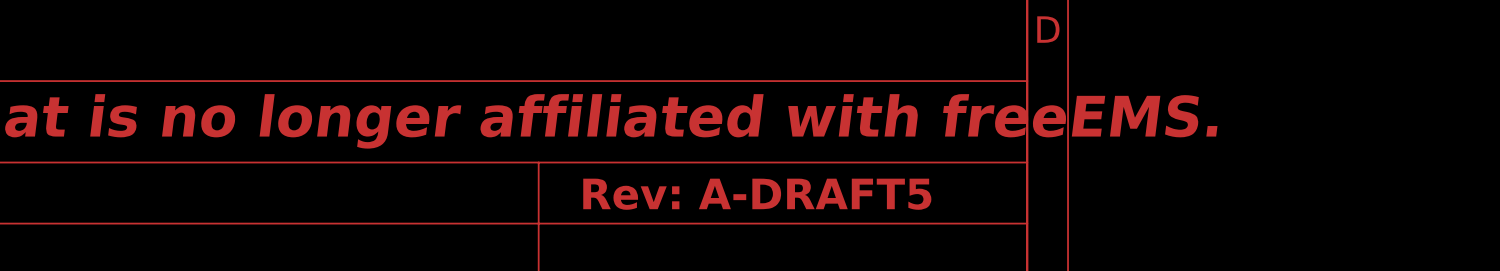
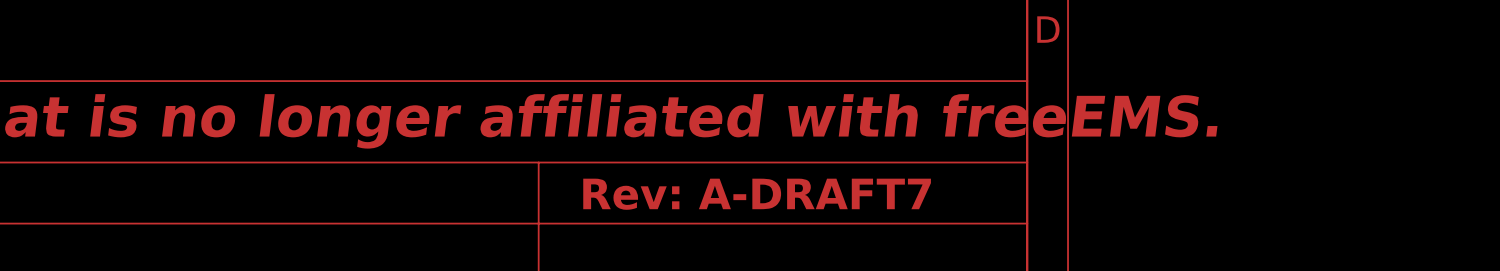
title block: Rev: A-DRAFT5 (757, 194) -> Rev: A-DRAFT7 (757, 194)

